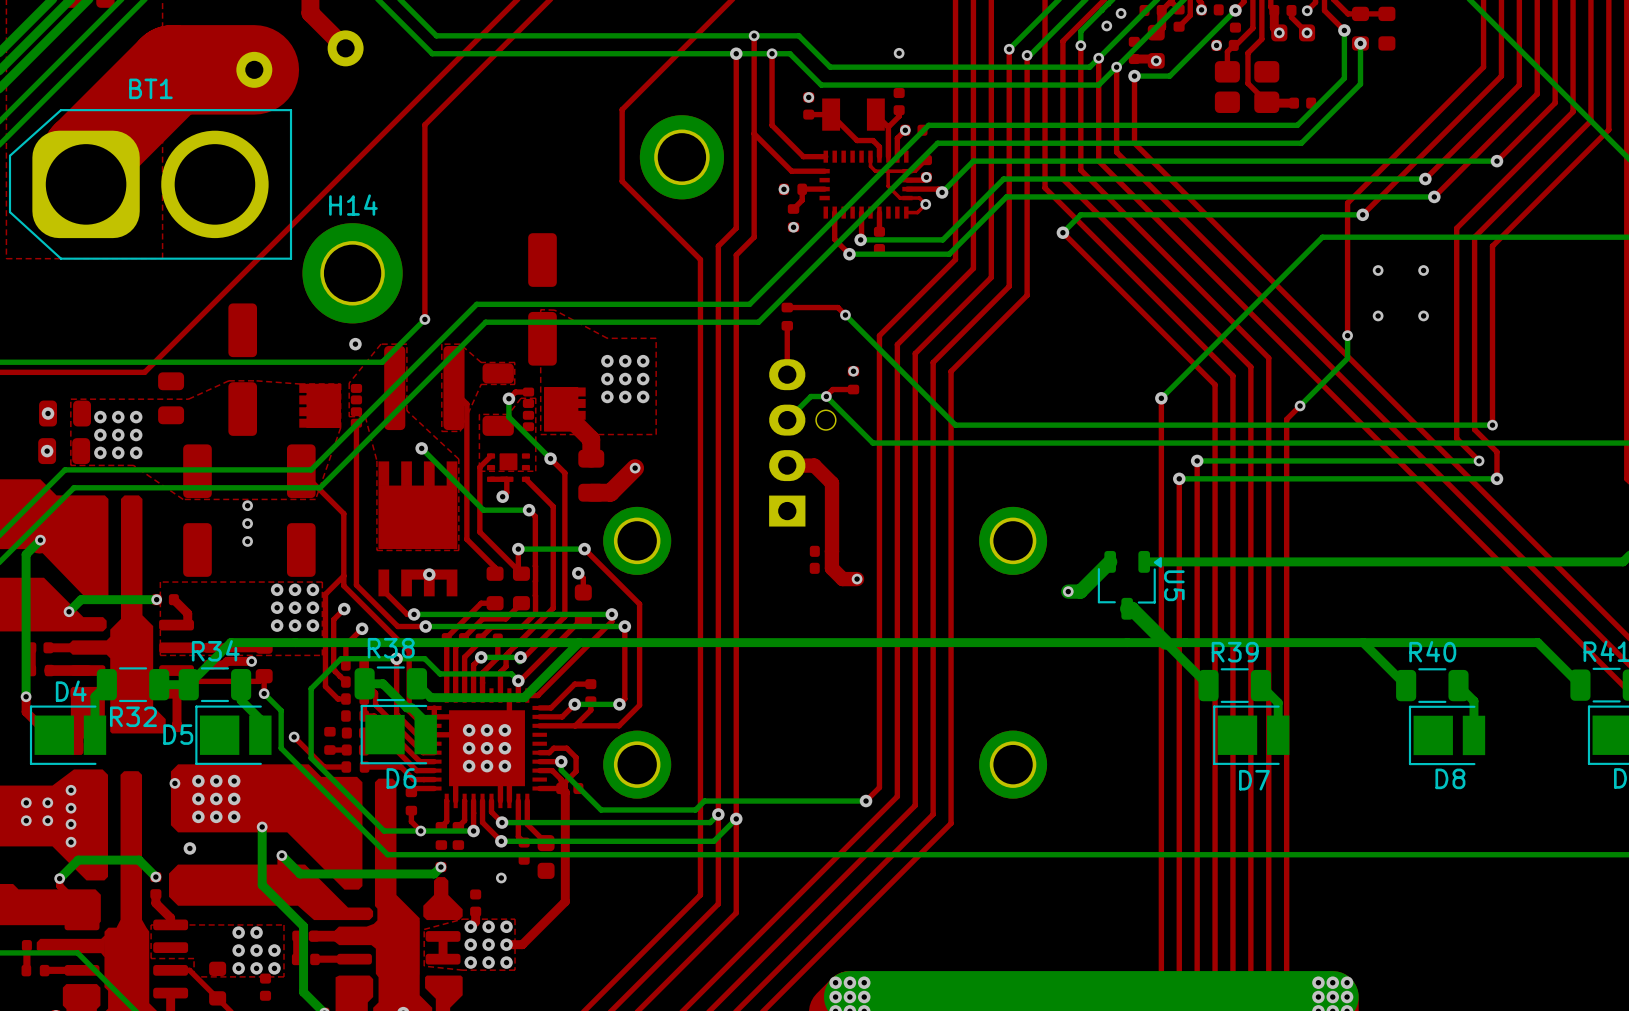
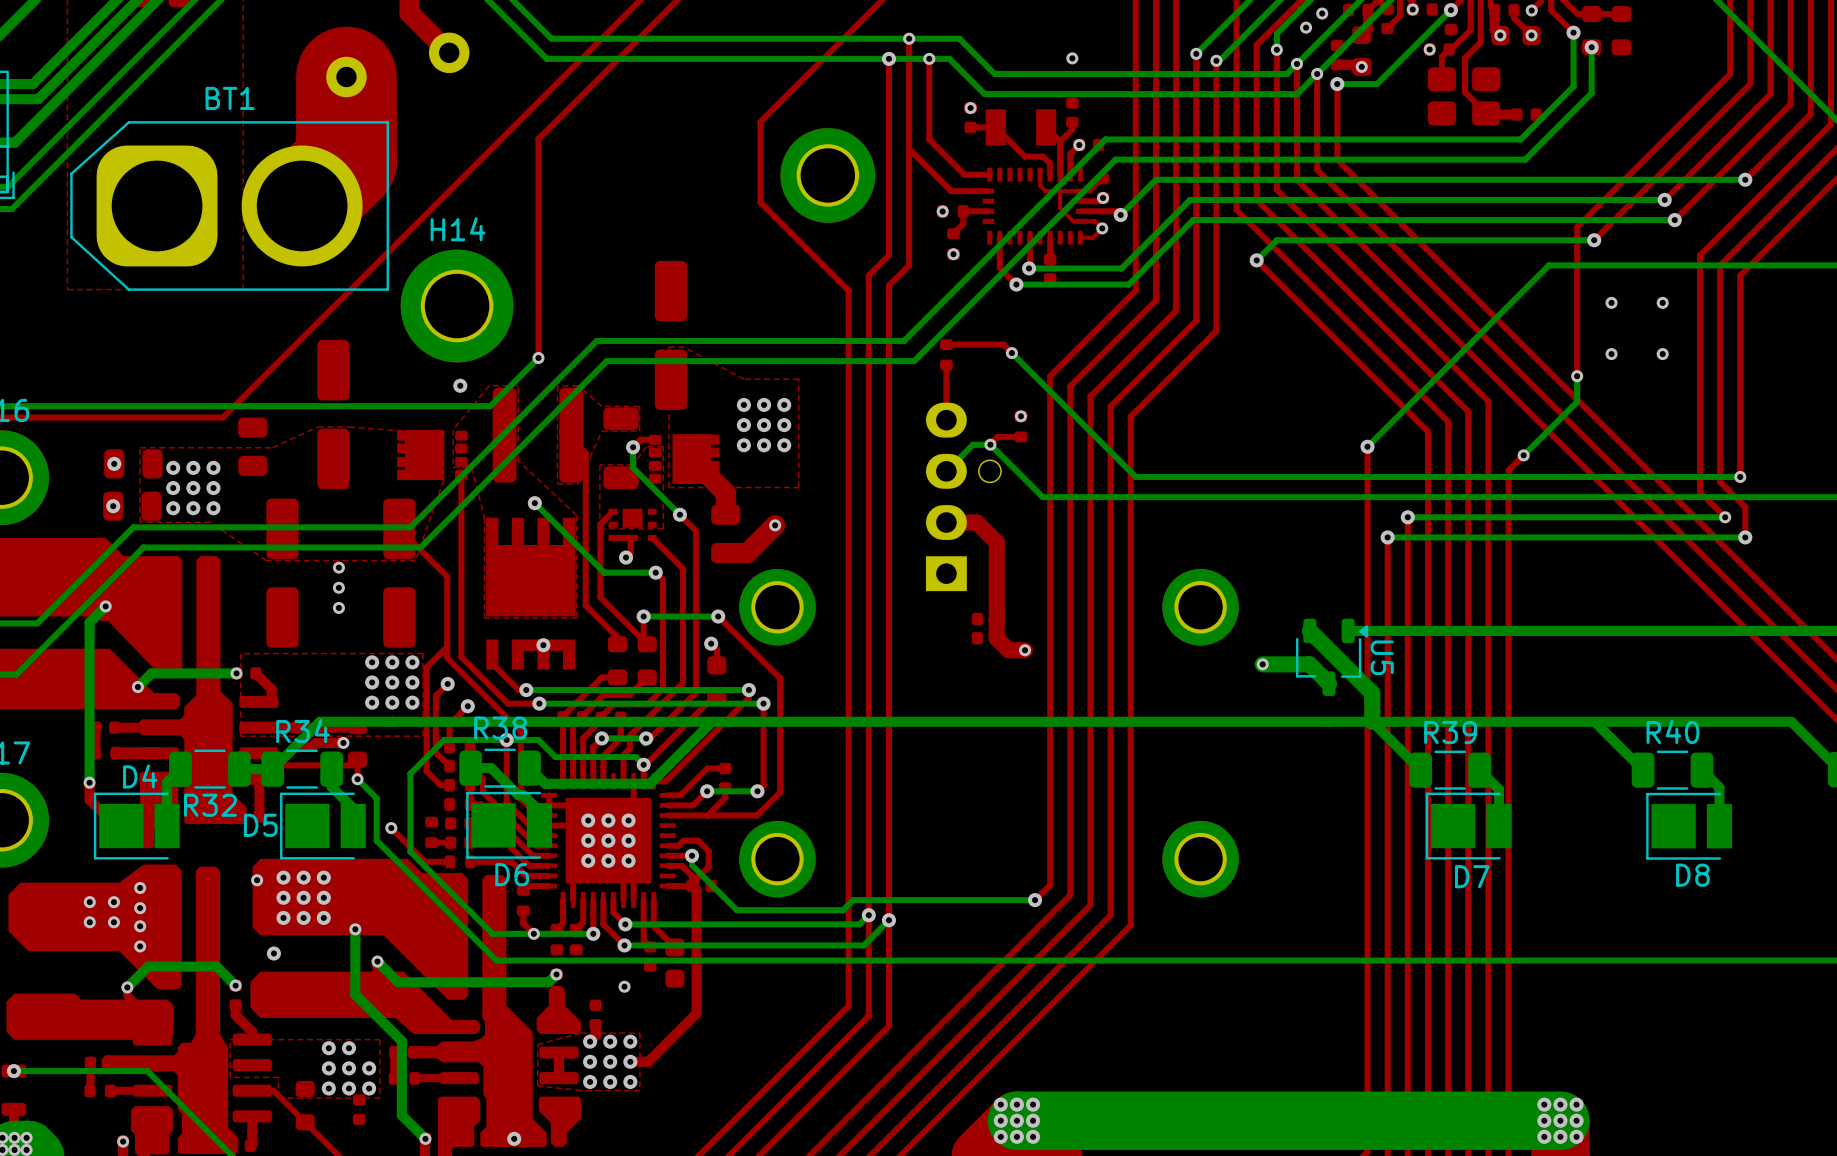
top track: (254, 69) (172, 69) (86, 156) (86, 184) -> (346, 77) (346, 161) (302, 205)
bottom track: (1110, 561) (1080, 591) -> (1329, 683) (1309, 664) (1276, 664)
bottom track: (1127, 608) (1131, 608) (1165, 642) -> (1309, 630) (1372, 693) (1372, 721)

